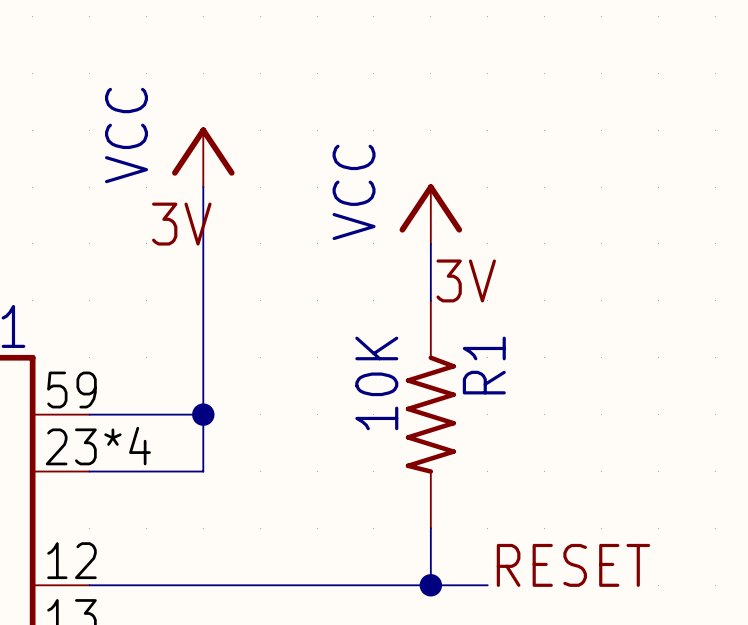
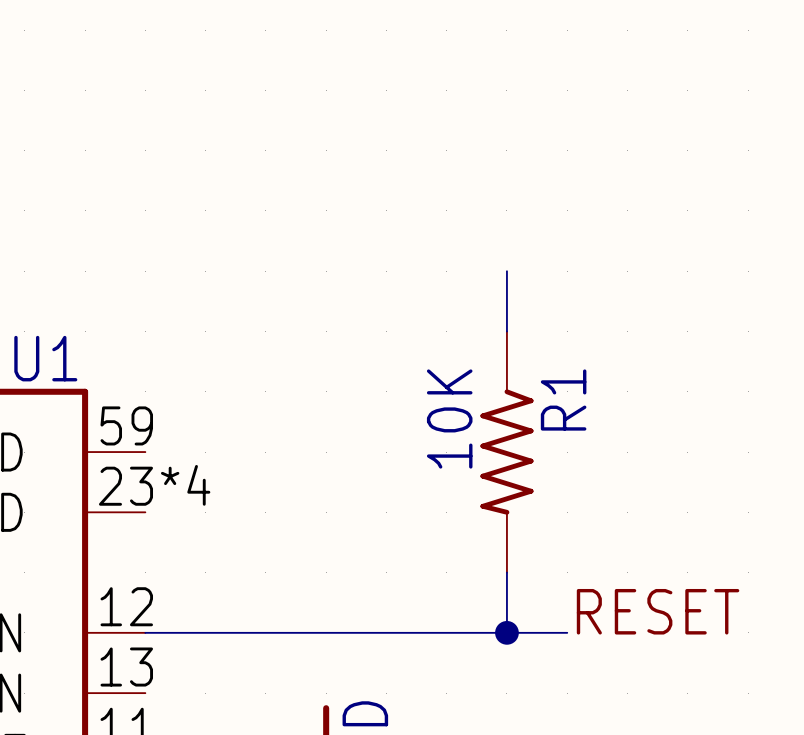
power symbol: VCC (203, 157) -> none
wire: (203, 187) (203, 471) (89, 471) -> none
power symbol: VCC (430, 214) -> none
label: 3V (181, 224) -> none
label: 3V (466, 280) -> none
wire: (89, 414) (203, 414) -> none
junction: (203, 414) -> none

